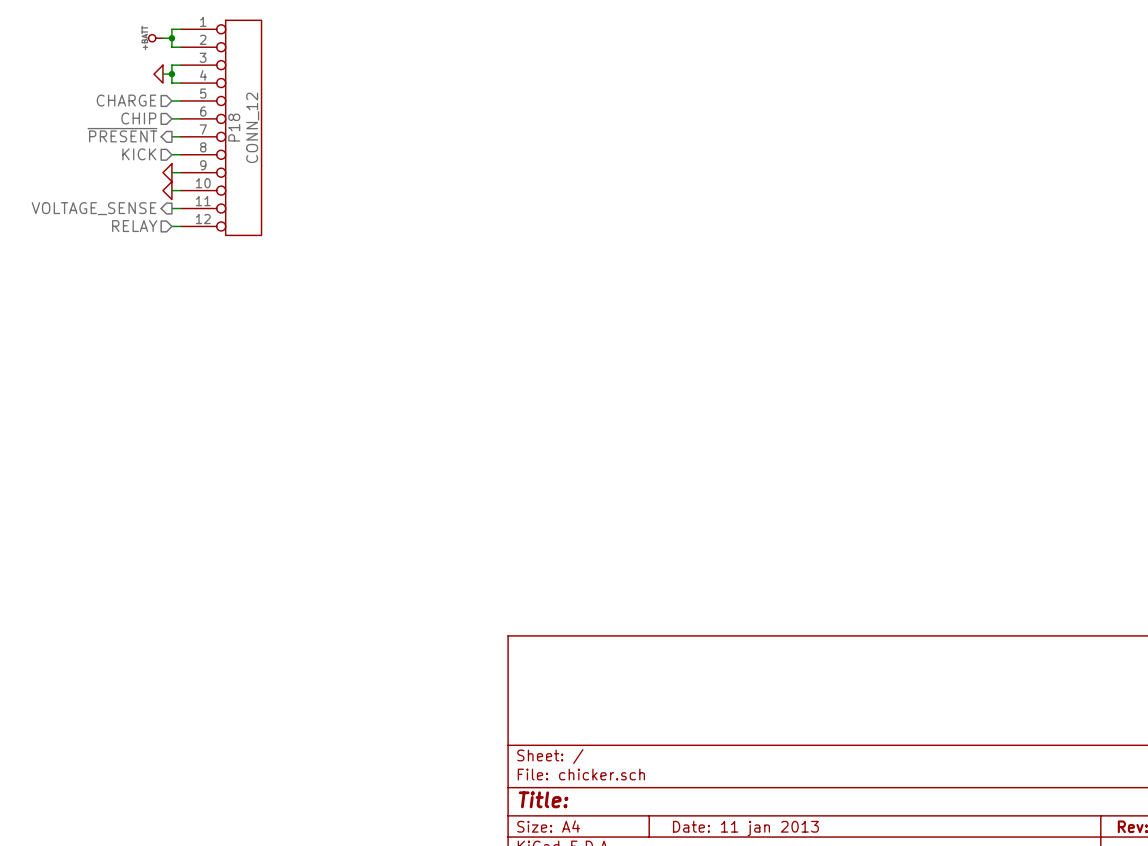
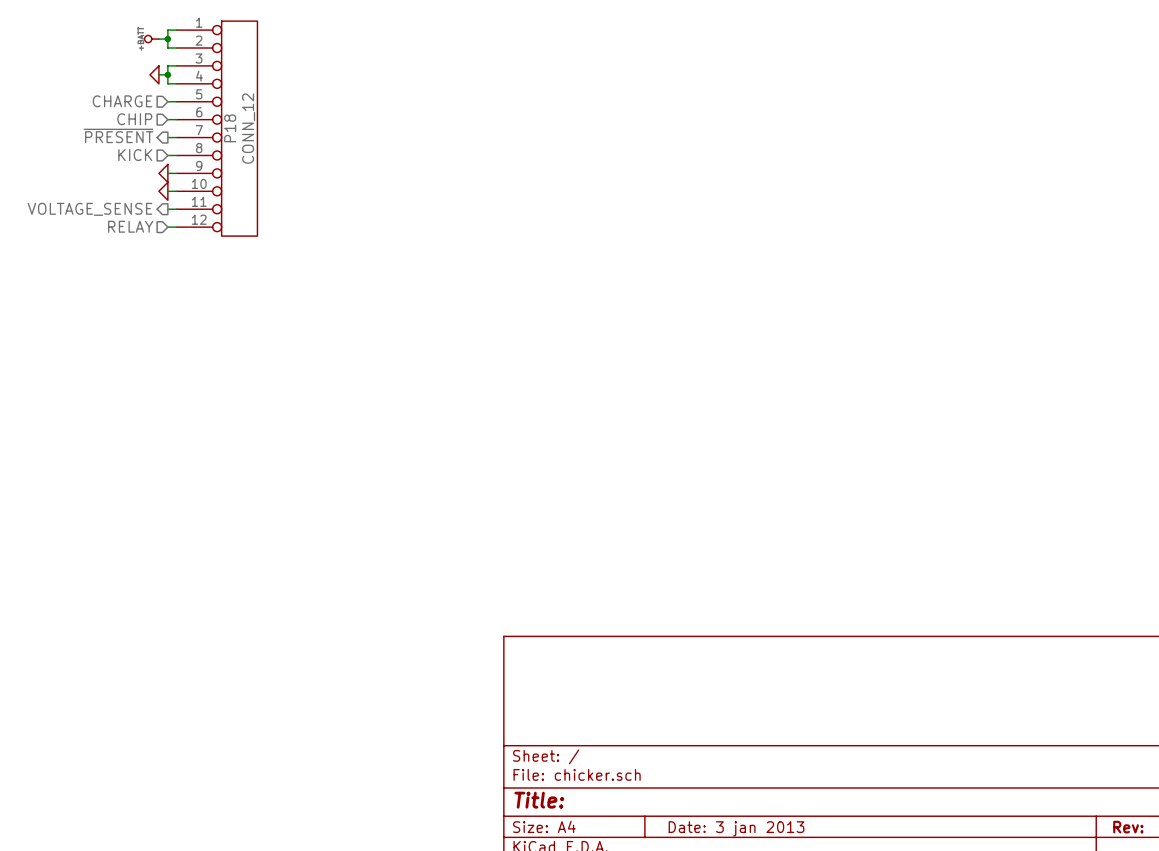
title block: Date: 11 jan 2013 (745, 828) -> Date: 3 jan 2013 (736, 828)

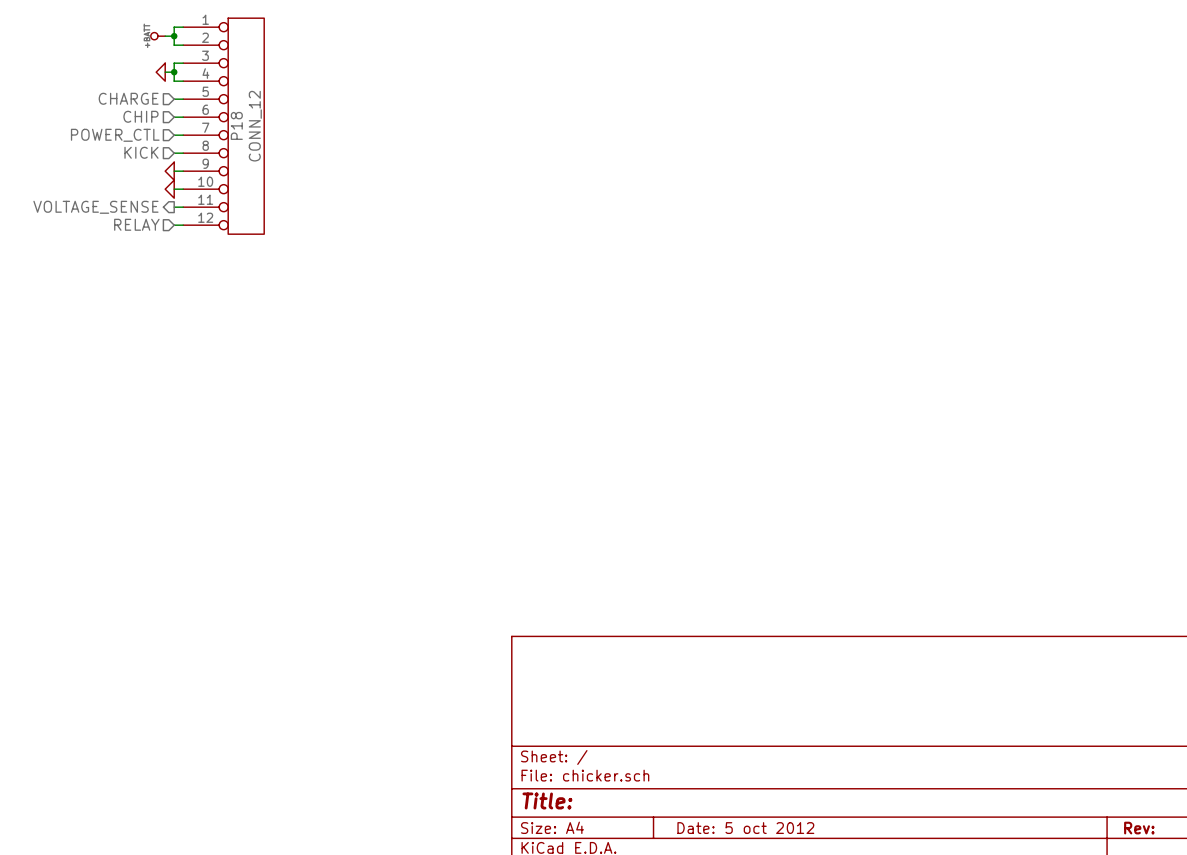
hierarchical label shape: output (118, 135) -> input (115, 135)
hierarchical label: ~{PRESENT} (118, 135) -> POWER_CTL (115, 135)
title block: Date: 3 jan 2013 (736, 828) -> Date: 5 oct 2012 (745, 828)

